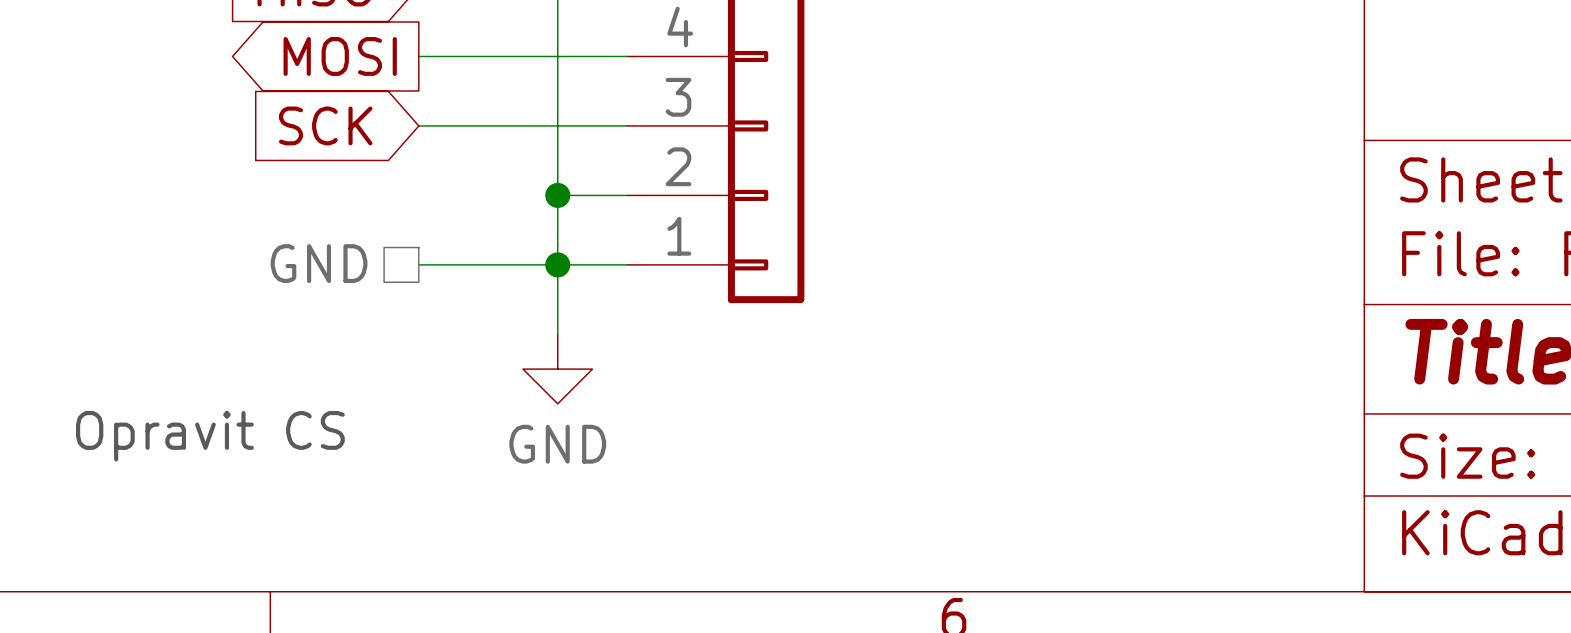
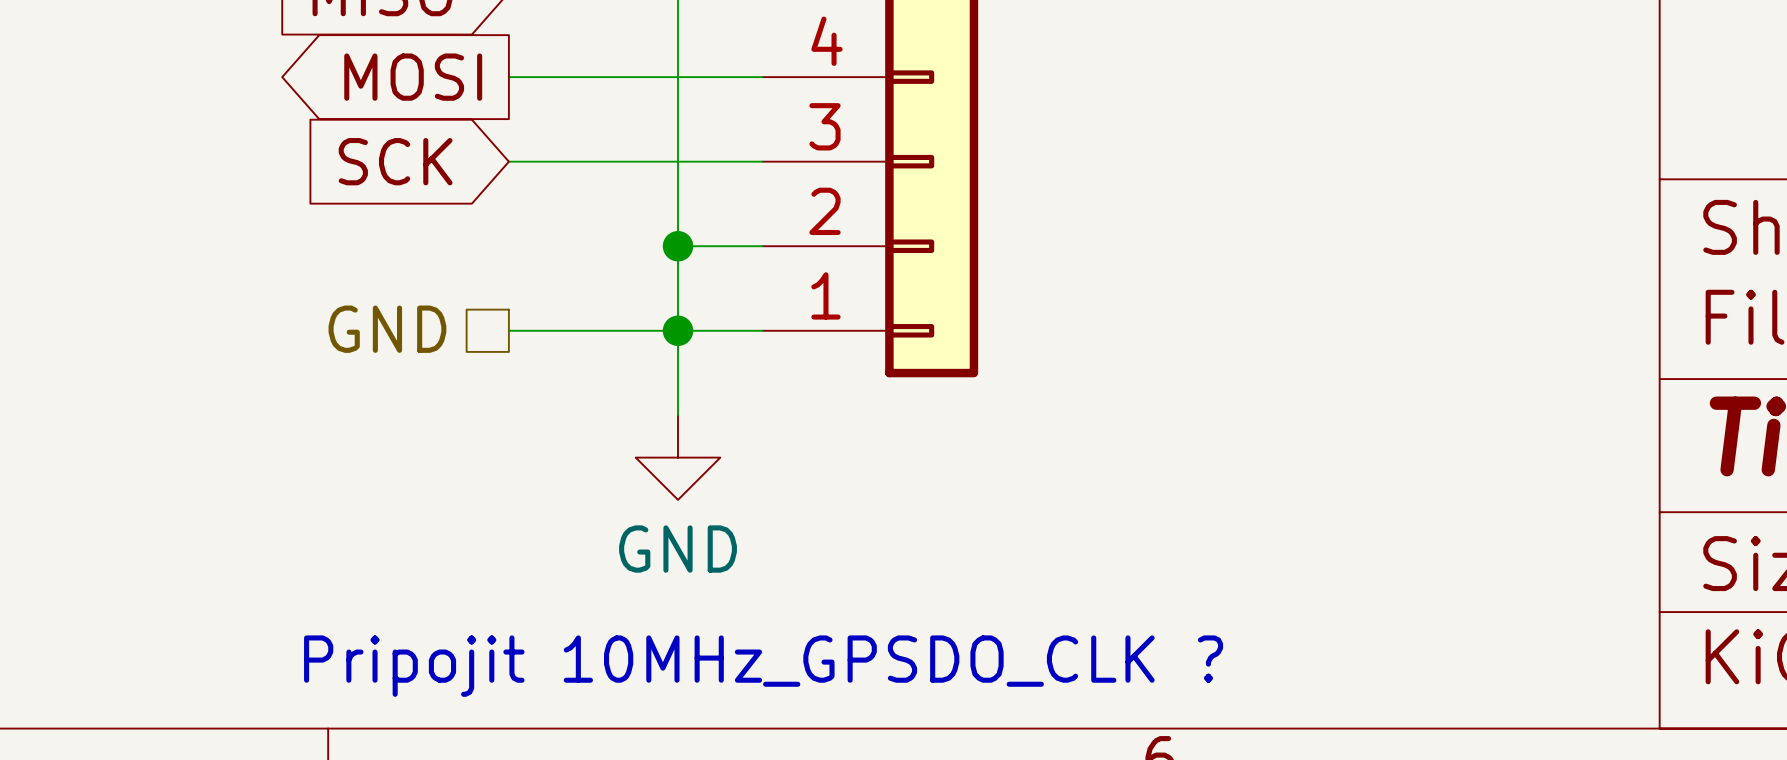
text: Opravit CS (210, 436) -> none
text: none -> Pripojit 10MHz_GPSDO_CLK ? (763, 666)

